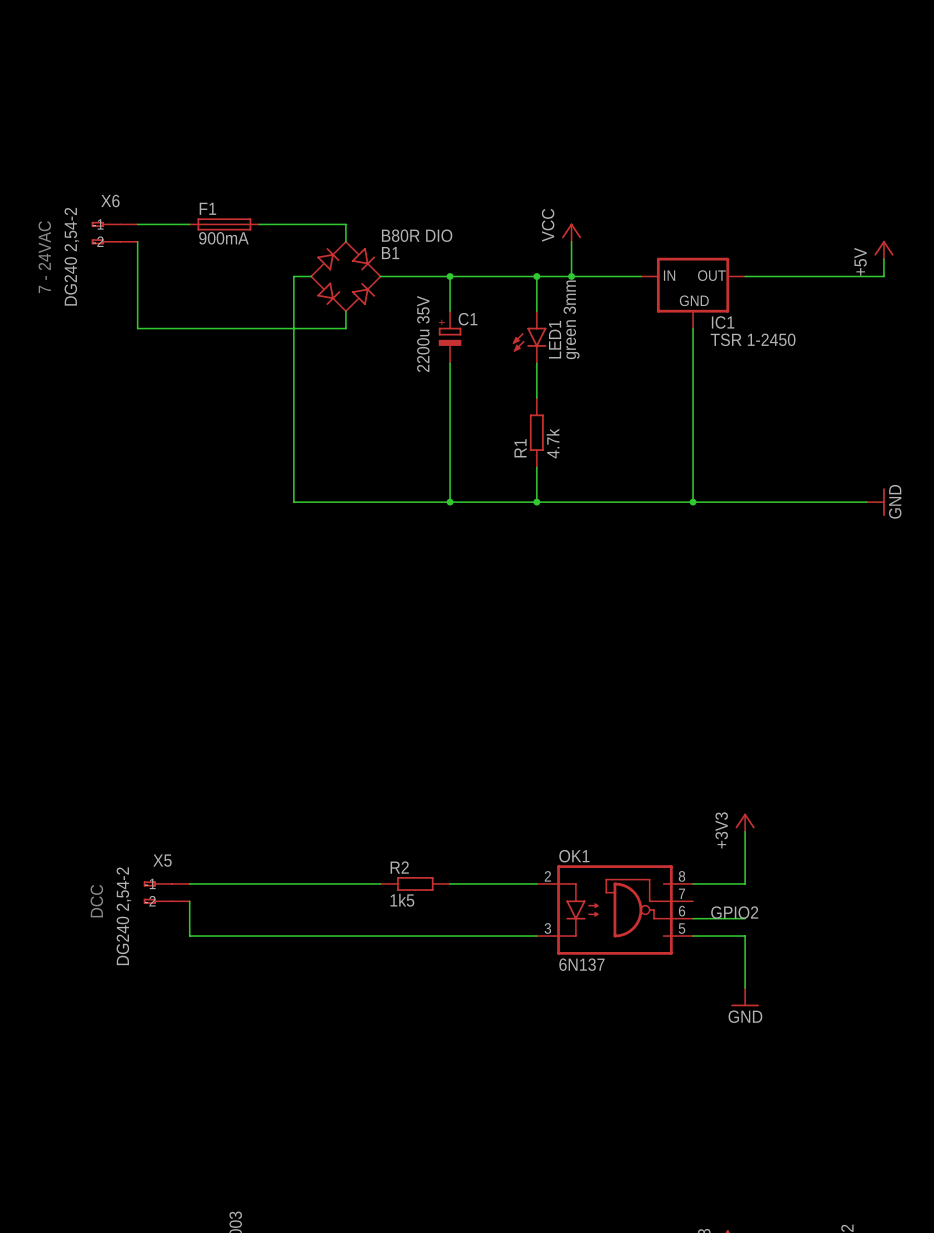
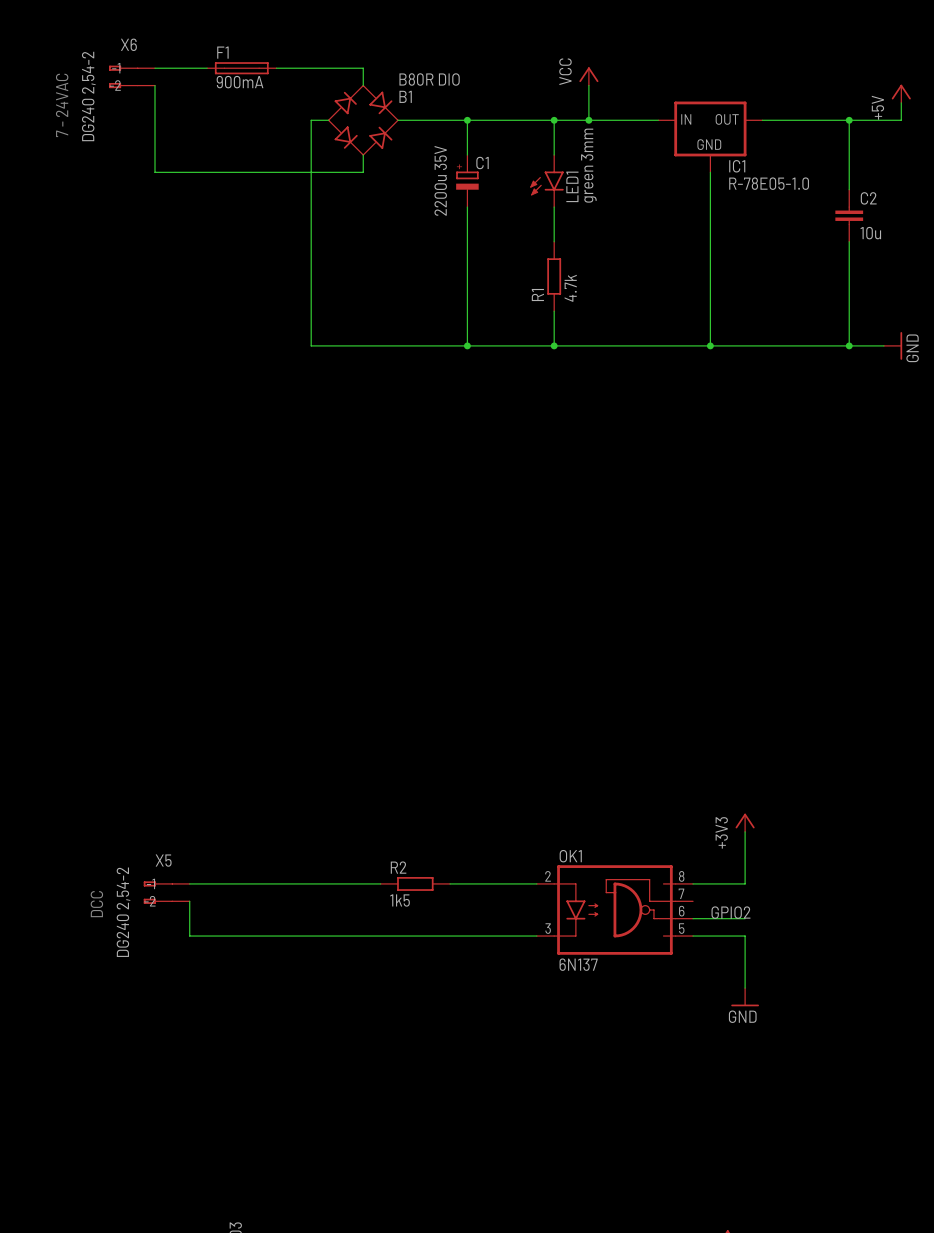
junction: none -> (467, 120)
junction: none -> (554, 120)
junction: none -> (588, 120)
wire: none -> (849, 120) (849, 189)
junction: none -> (849, 120)
C2: none -> 10u (849, 215)
wire: (137, 224) (189, 224) -> (155, 68) (207, 68)
F1 position: (224, 224) -> (241, 68)
wire: (259, 224) (345, 224) (345, 241) -> (276, 68) (363, 68) (363, 85)
power symbol position: VCC (571, 232) -> VCC (588, 76)
X6 position: (114, 233) -> (132, 76)
wire: (137, 241) (137, 328) (345, 328) (345, 311) -> (155, 85) (155, 172) (363, 172) (363, 155)
wire: (571, 241) (571, 276) -> (588, 85) (588, 120)
wire: none -> (849, 241) (849, 345)
power symbol position: +5V (883, 250) -> +5V (901, 93)
text position: 7 - 24VAC (44, 257) -> 7 - 24VAC (62, 105)
wire: (883, 259) (883, 276) (745, 276) -> (901, 102) (901, 120) (762, 120)
wire: (311, 276) (293, 276) (293, 502) (866, 502) -> (328, 120) (311, 120) (311, 345) (883, 345)
B1 position: (345, 276) -> (363, 120)
wire: (380, 276) (640, 276) -> (397, 120) (658, 120)
wire: (450, 276) (450, 311) -> (467, 120) (467, 155)
junction: (450, 276) -> none
wire: (536, 276) (536, 311) -> (554, 120) (554, 155)
junction: (536, 276) -> none
junction: (571, 276) -> none
IC1 position: (693, 293) -> (710, 136)
wire: (693, 328) (693, 502) -> (710, 172) (710, 345)
C1 position: (450, 337) -> (467, 181)
LED1 position: (529, 337) -> (546, 181)
IC1 value: TSR 1-2450 (753, 339) -> R-78E05-1.0 (769, 183)
junction: none -> (467, 345)
junction: none -> (554, 345)
junction: none -> (710, 345)
junction: none -> (849, 345)
wire: (450, 363) (450, 502) -> (467, 207) (467, 345)
wire: (536, 363) (536, 397) -> (554, 207) (554, 241)
R1 position: (536, 432) -> (554, 276)
wire: (536, 467) (536, 502) -> (554, 311) (554, 345)
junction: (450, 502) -> none
junction: (536, 502) -> none
junction: (693, 502) -> none
power symbol position: GND (875, 502) -> GND (893, 345)

